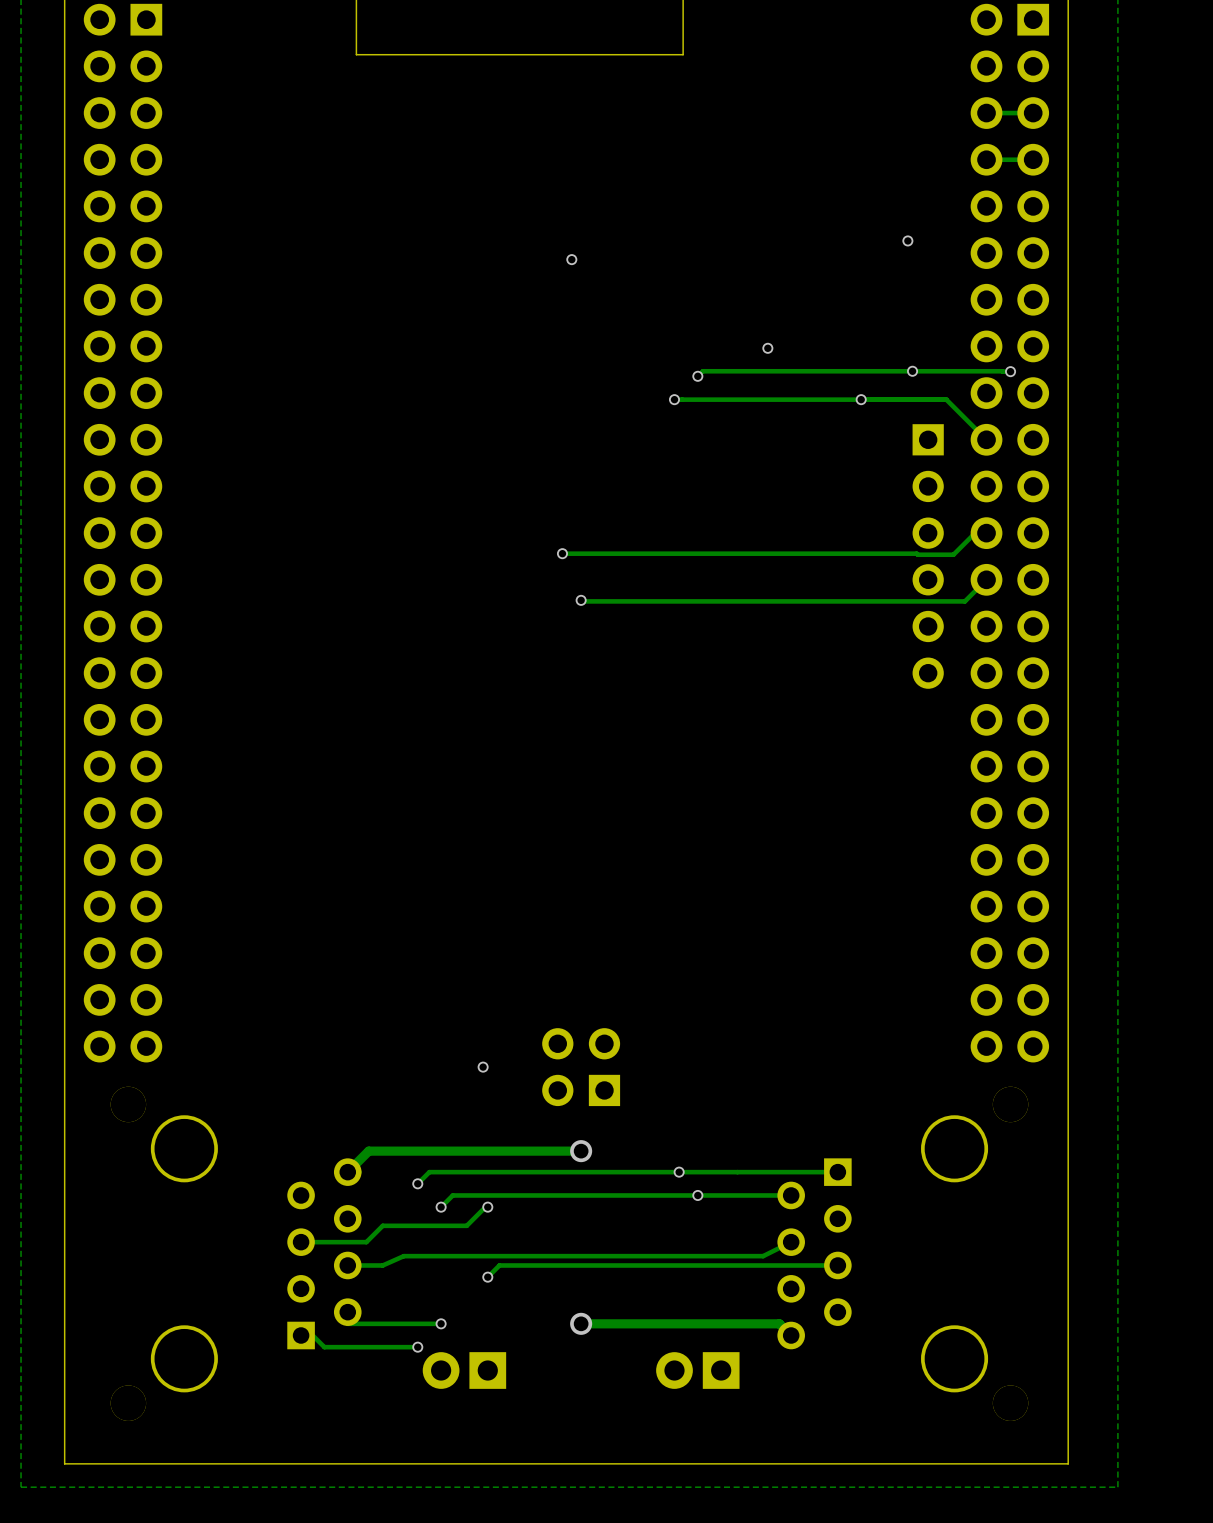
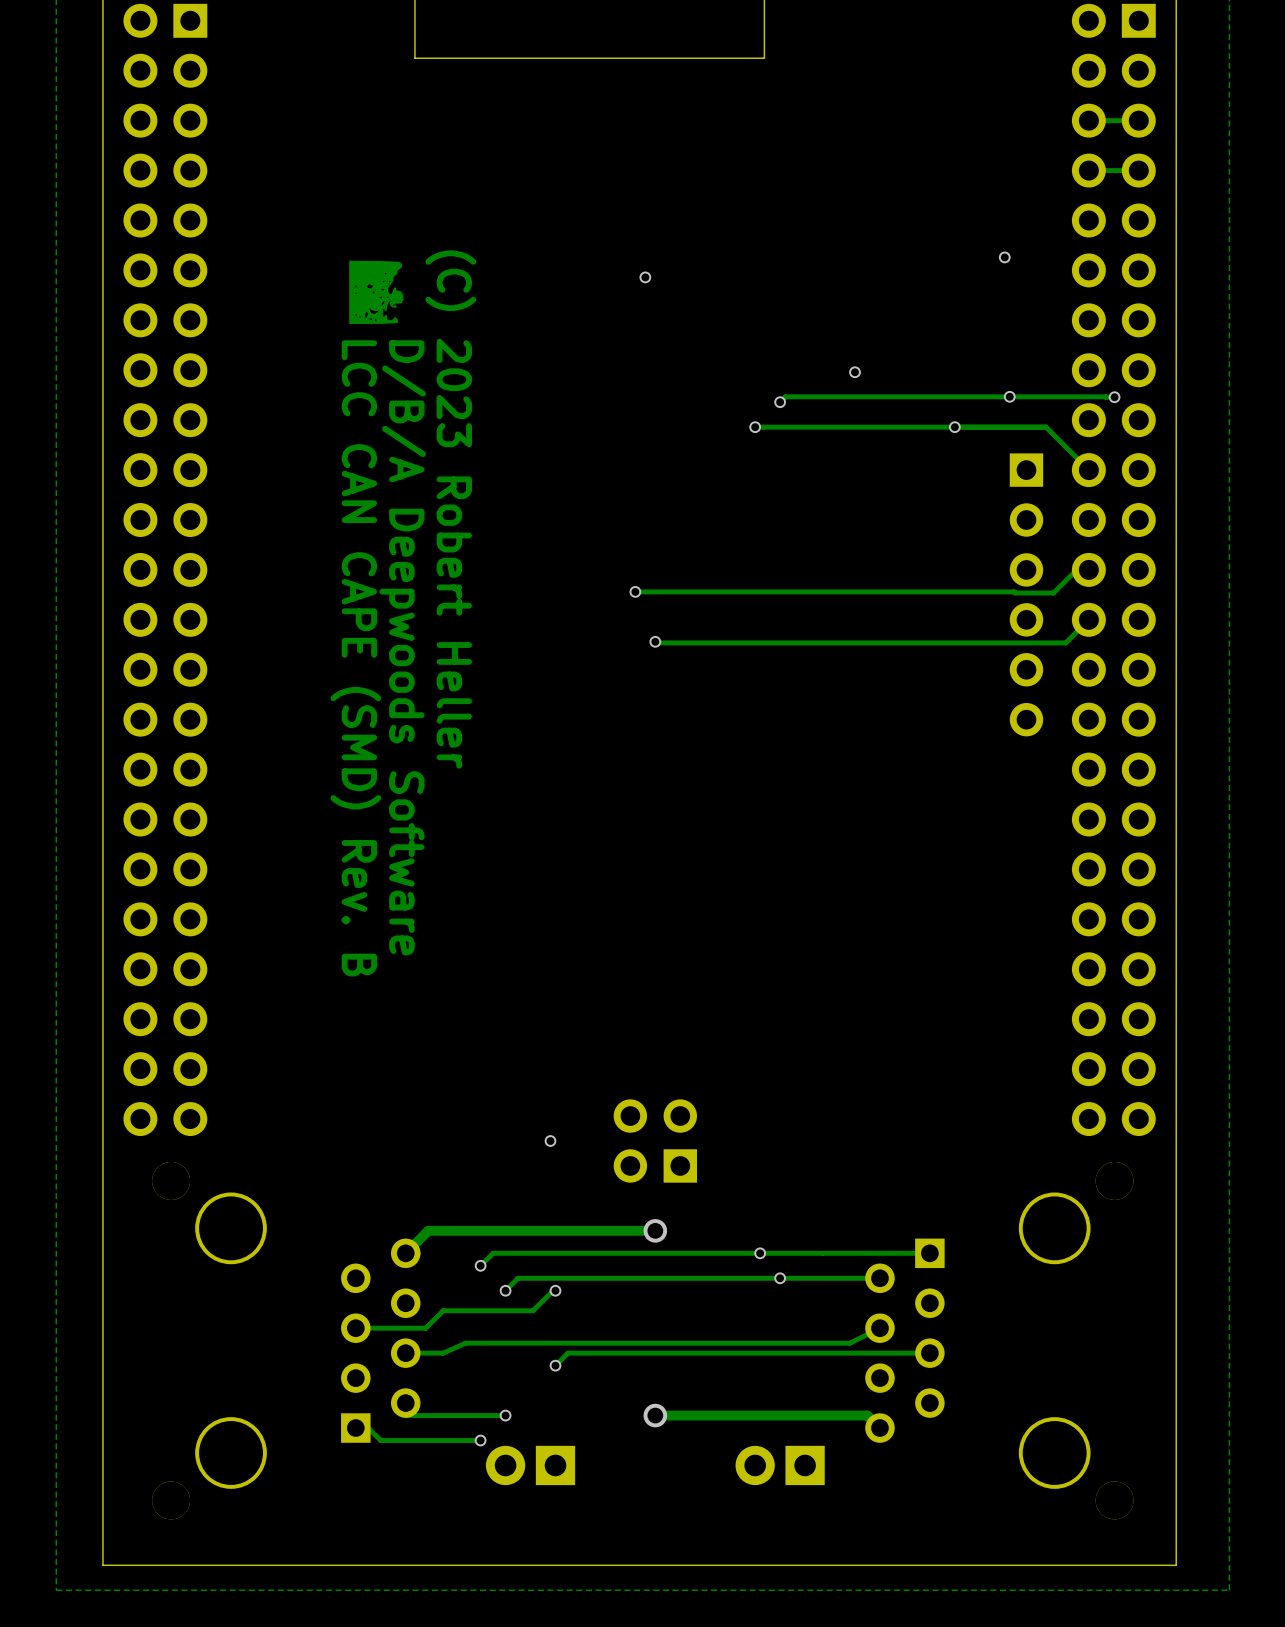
drawing: none -> [349, 260, 404, 324]
text: none -> (C) 2023 Robert Heller (450, 509)
text: none -> D/B/A Deepwoods Software (402, 647)
text: none -> LCC CAN CAPE (SMD) Rev. B (355, 658)

